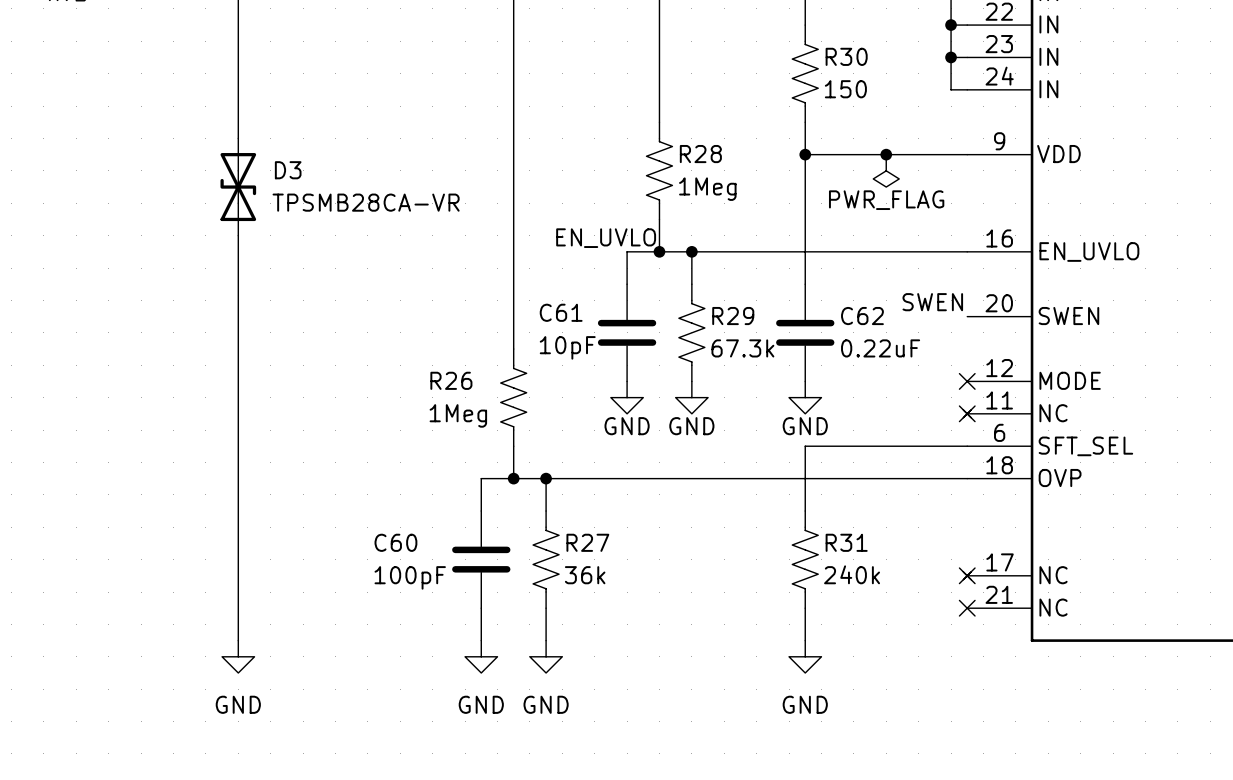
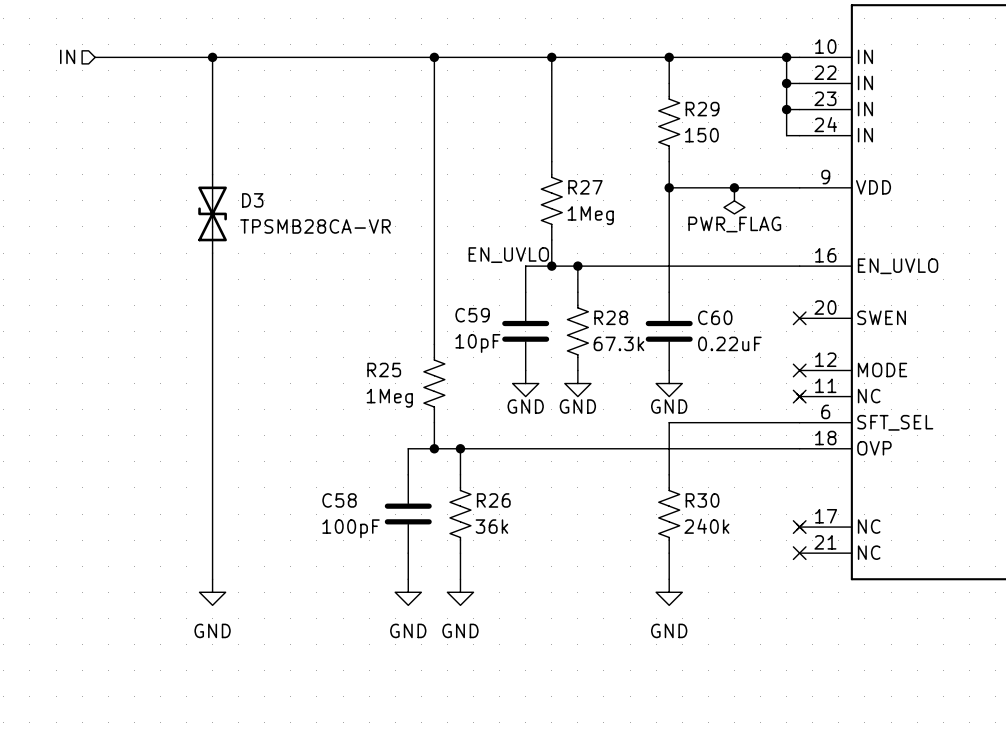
R30 name: R30 (846, 56) -> R29 (702, 109)
R28 name: R28 (700, 154) -> R27 (585, 187)
label: SWEN (932, 302) -> none
C61 name: C61 (561, 312) -> C59 (472, 315)
R29 name: R29 (733, 316) -> R28 (611, 317)
C62 name: C62 (862, 316) -> C60 (715, 317)
no-connect mark: none -> (799, 318)
R26 name: R26 (451, 380) -> R25 (384, 370)
C60 name: C60 (395, 542) -> C58 (339, 500)
R27 name: R27 (587, 542) -> R26 (493, 500)
R31 name: R31 (846, 542) -> R30 (702, 500)

